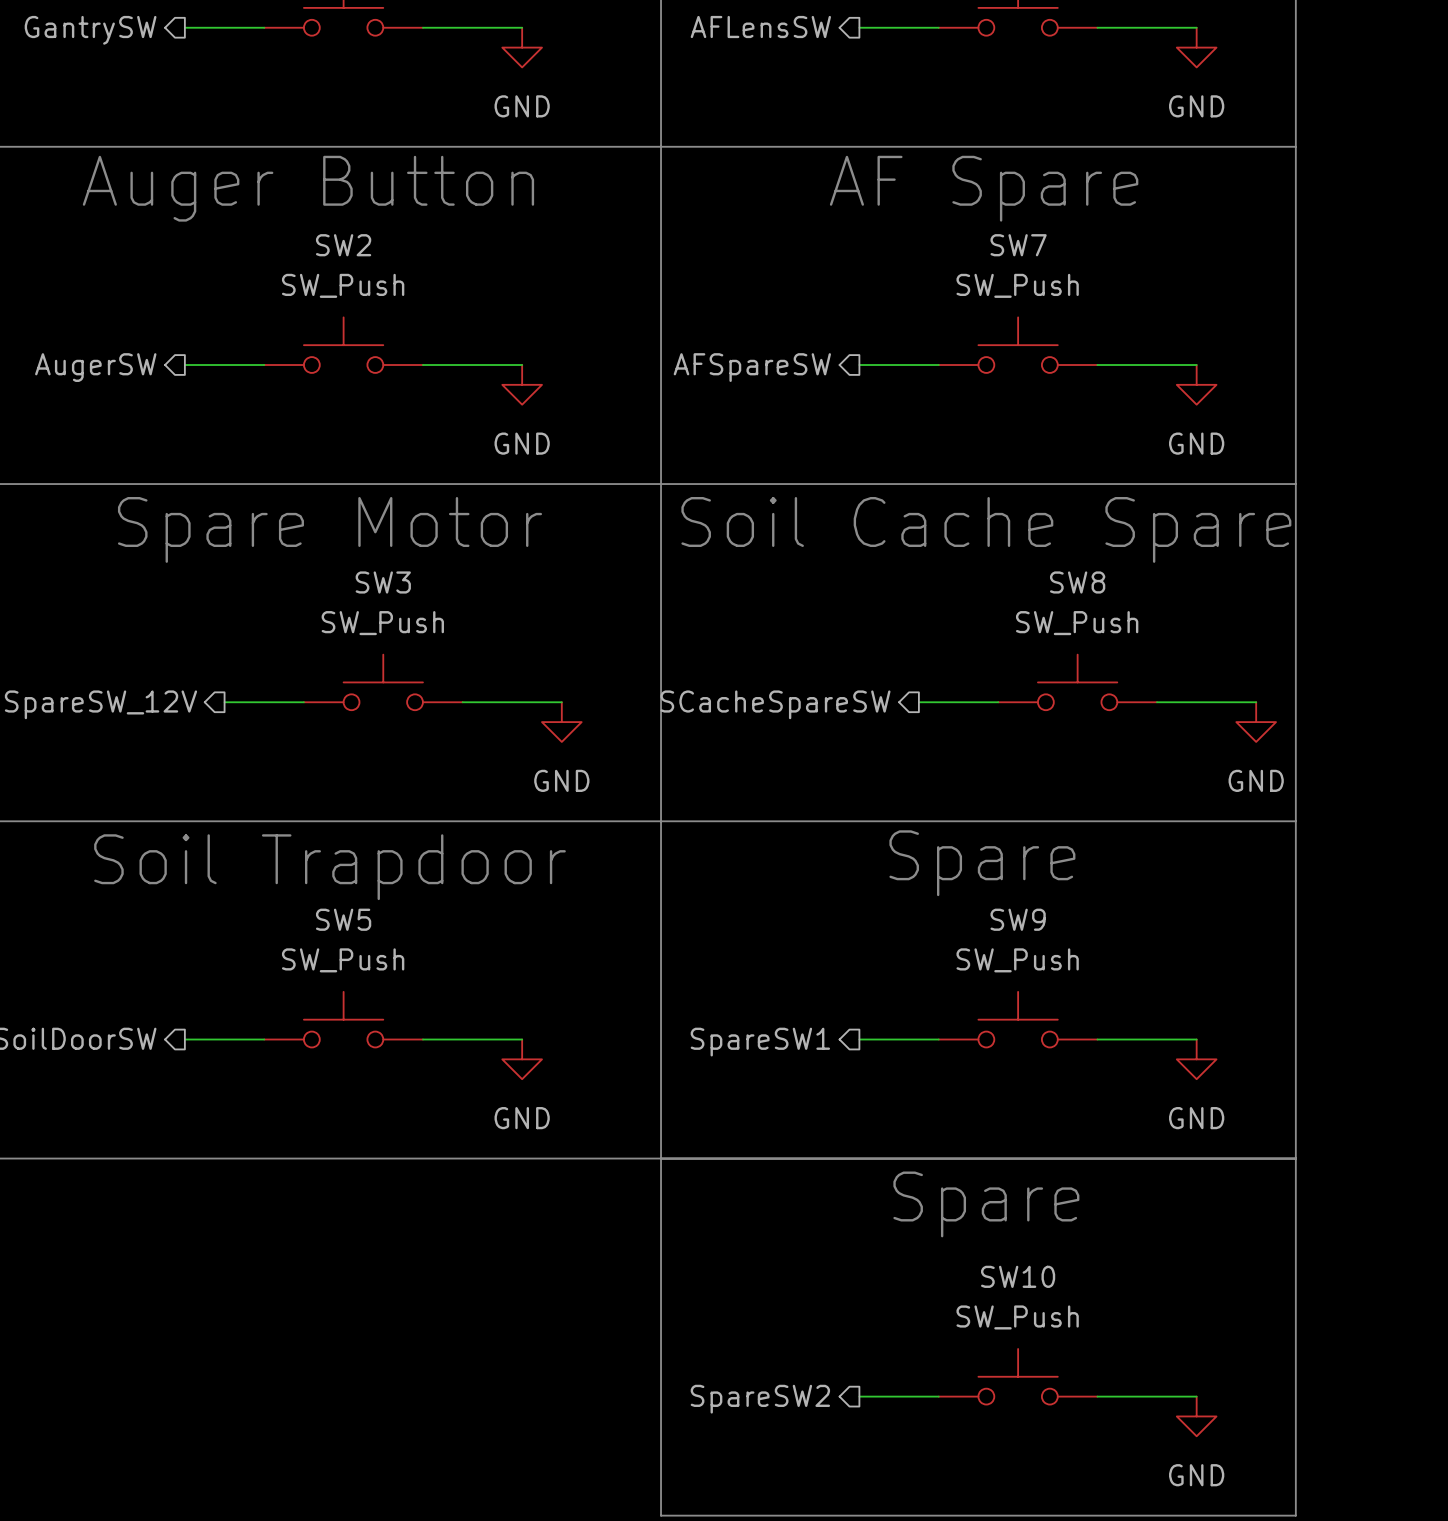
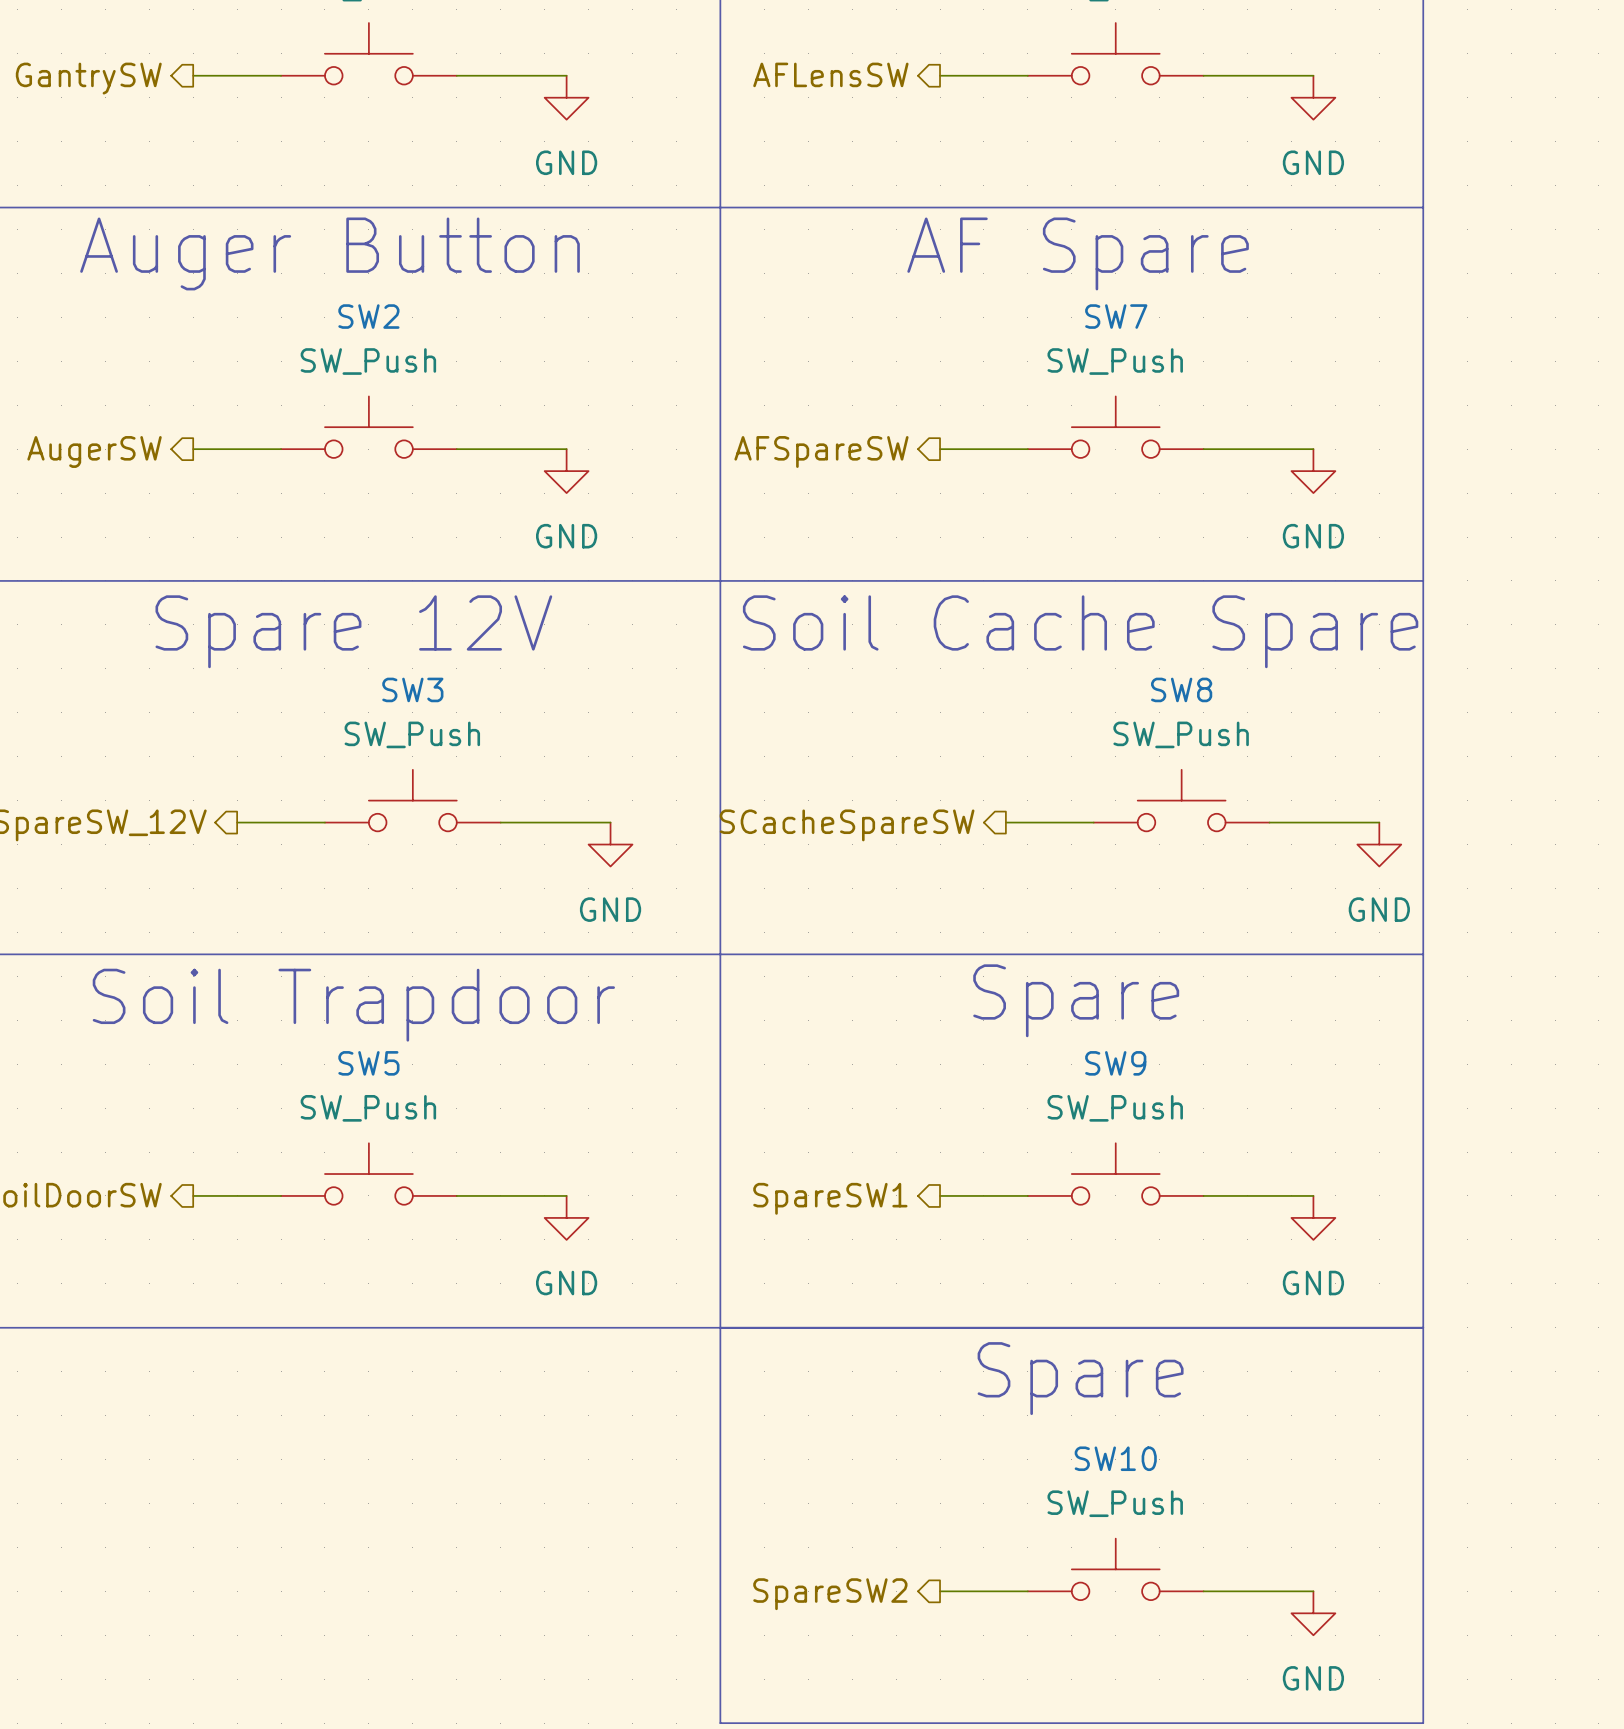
text: Spare Motor (330, 529) -> Spare 12V (353, 631)

